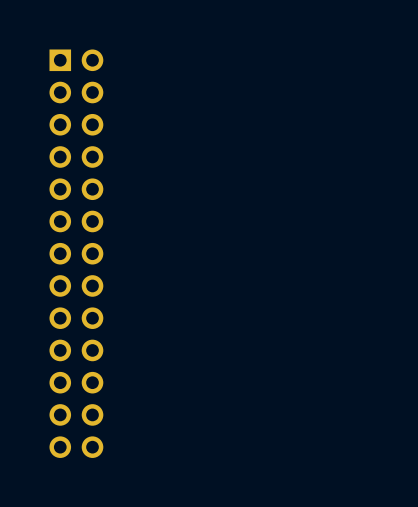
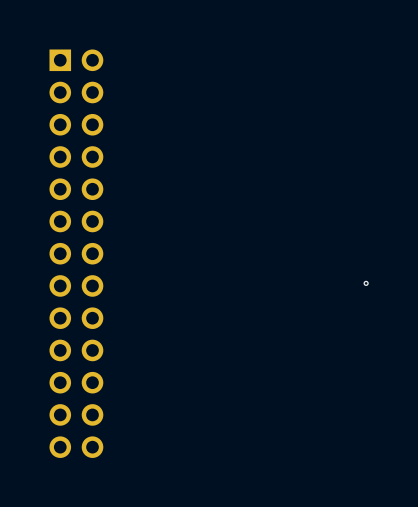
via: none -> (366, 283)

